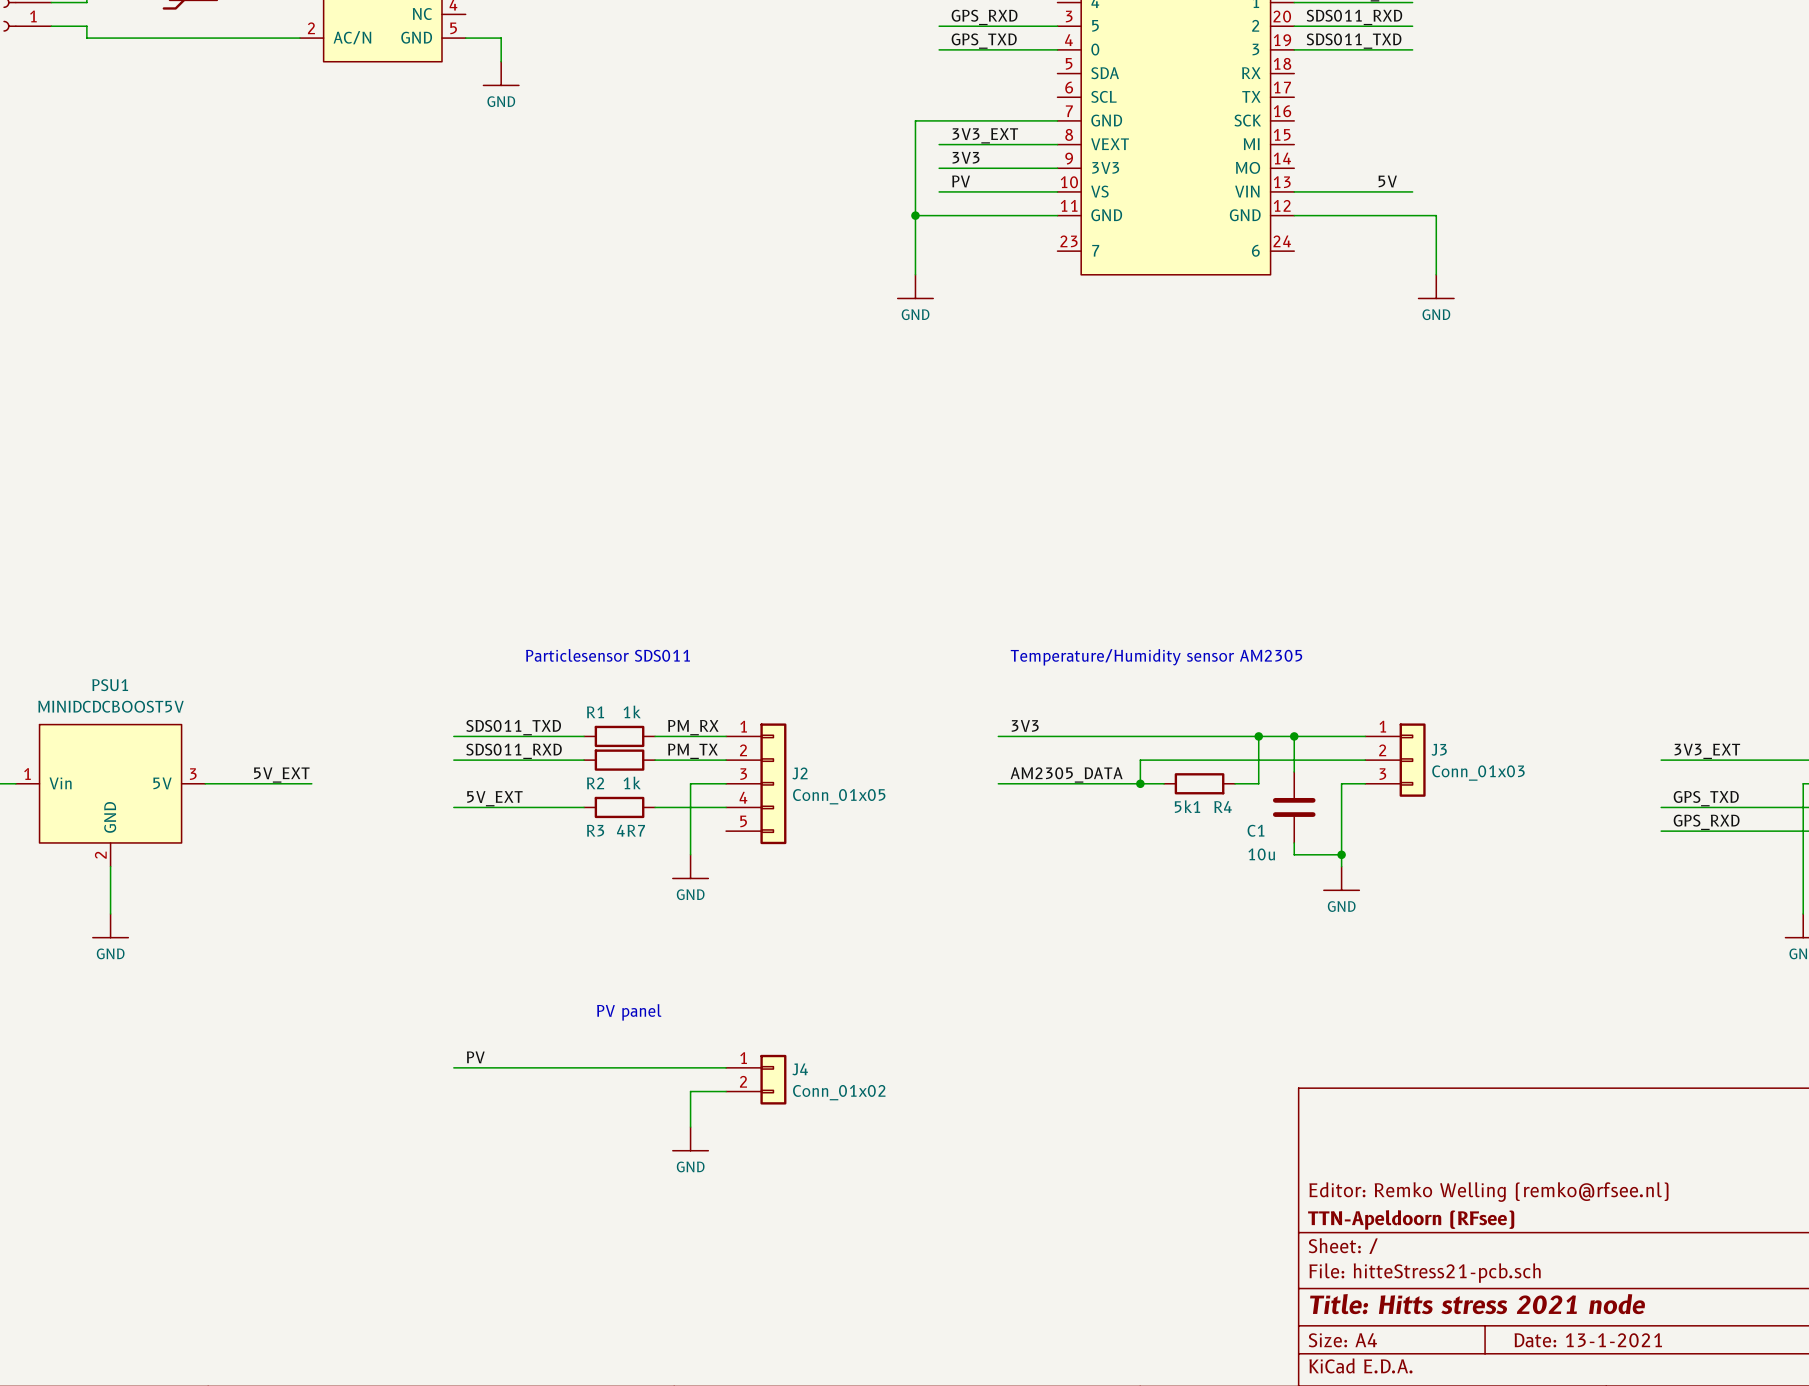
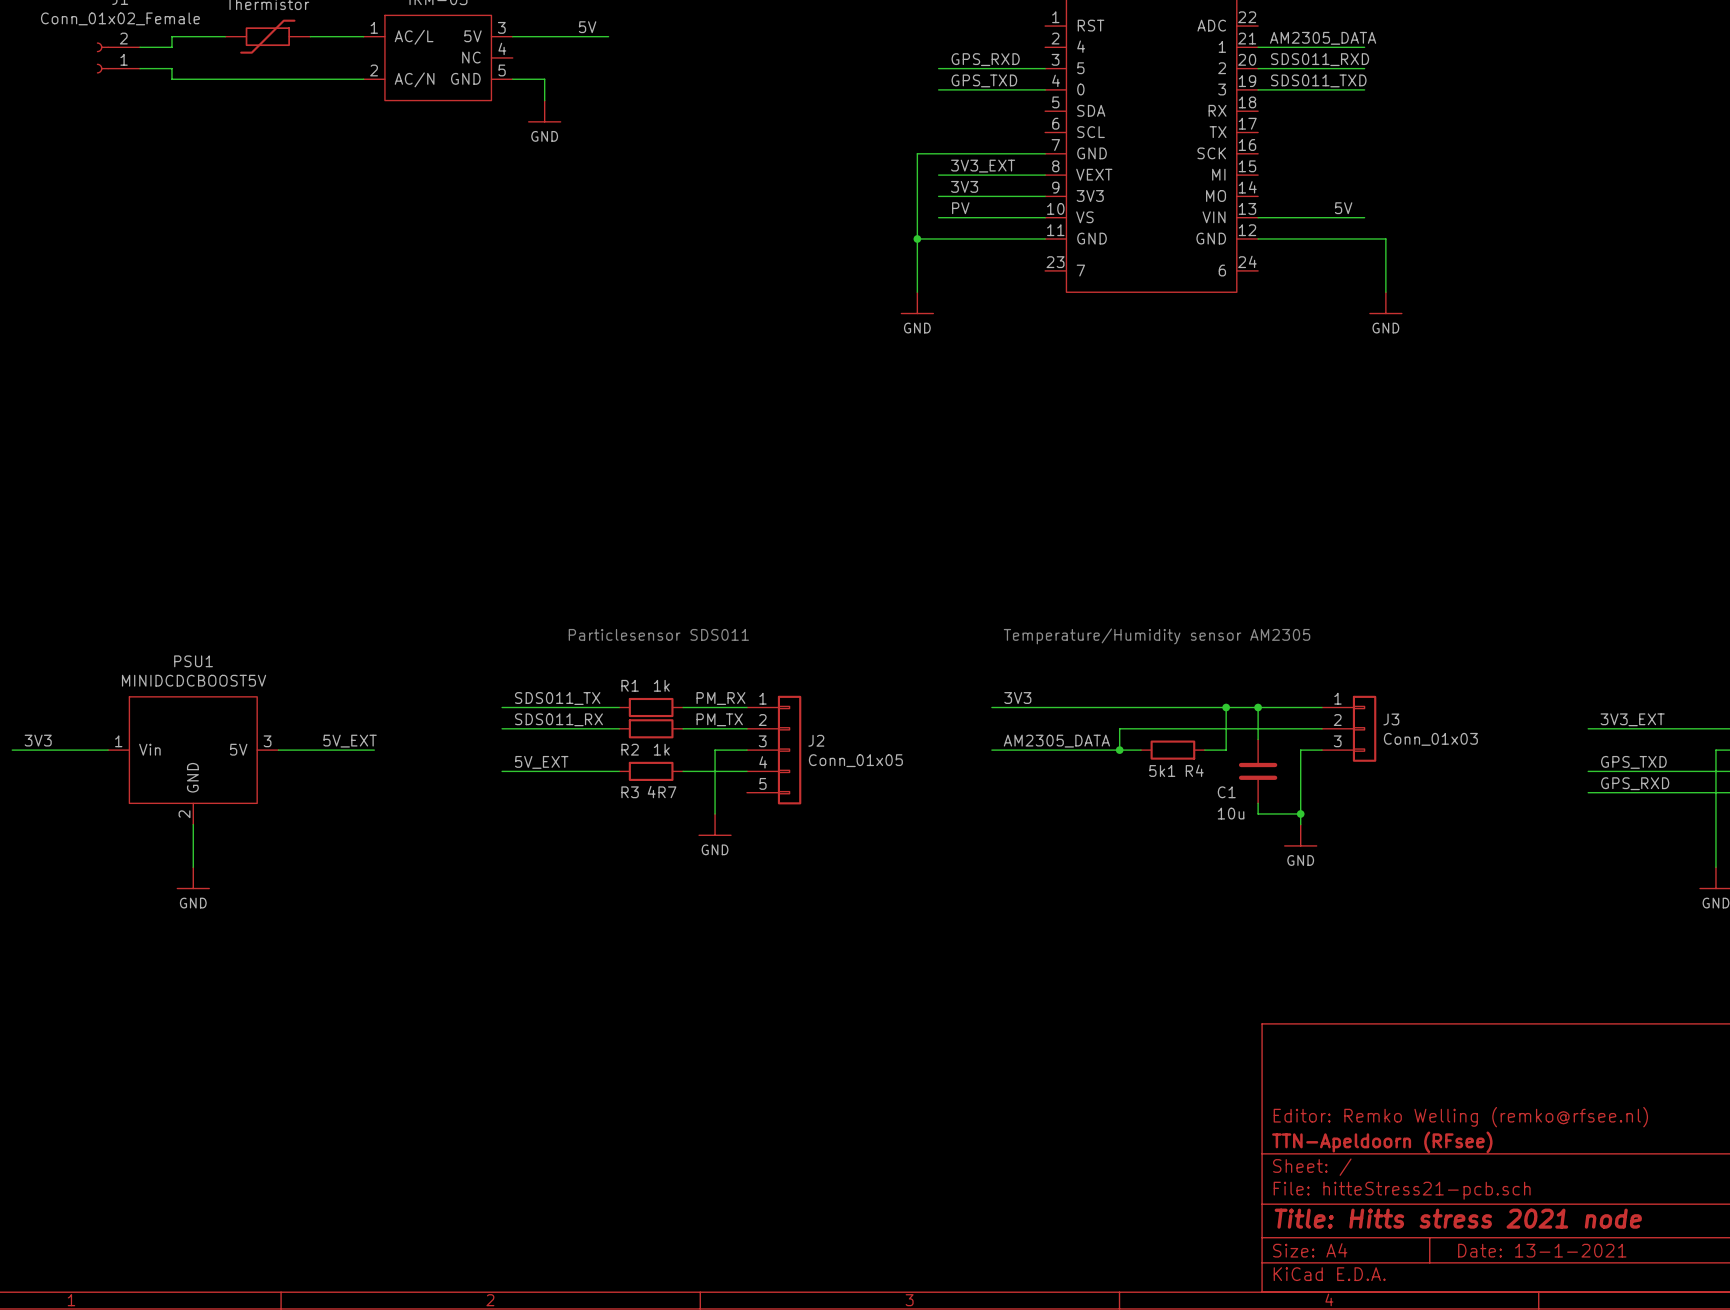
label: SDS011_TXD (513, 727) -> SDS011_TX (557, 698)
label: SDS011_RXD (514, 751) -> SDS011_RX (558, 719)
text: PV panel (629, 1012) -> none
label: PV (475, 1057) -> none
wire: (453, 1067) (726, 1067) -> none
J4: Conn_01x02 (756, 1079) -> none
wire: (726, 1091) (690, 1091) (690, 1127) -> none
power symbol: GND (690, 1138) -> none

